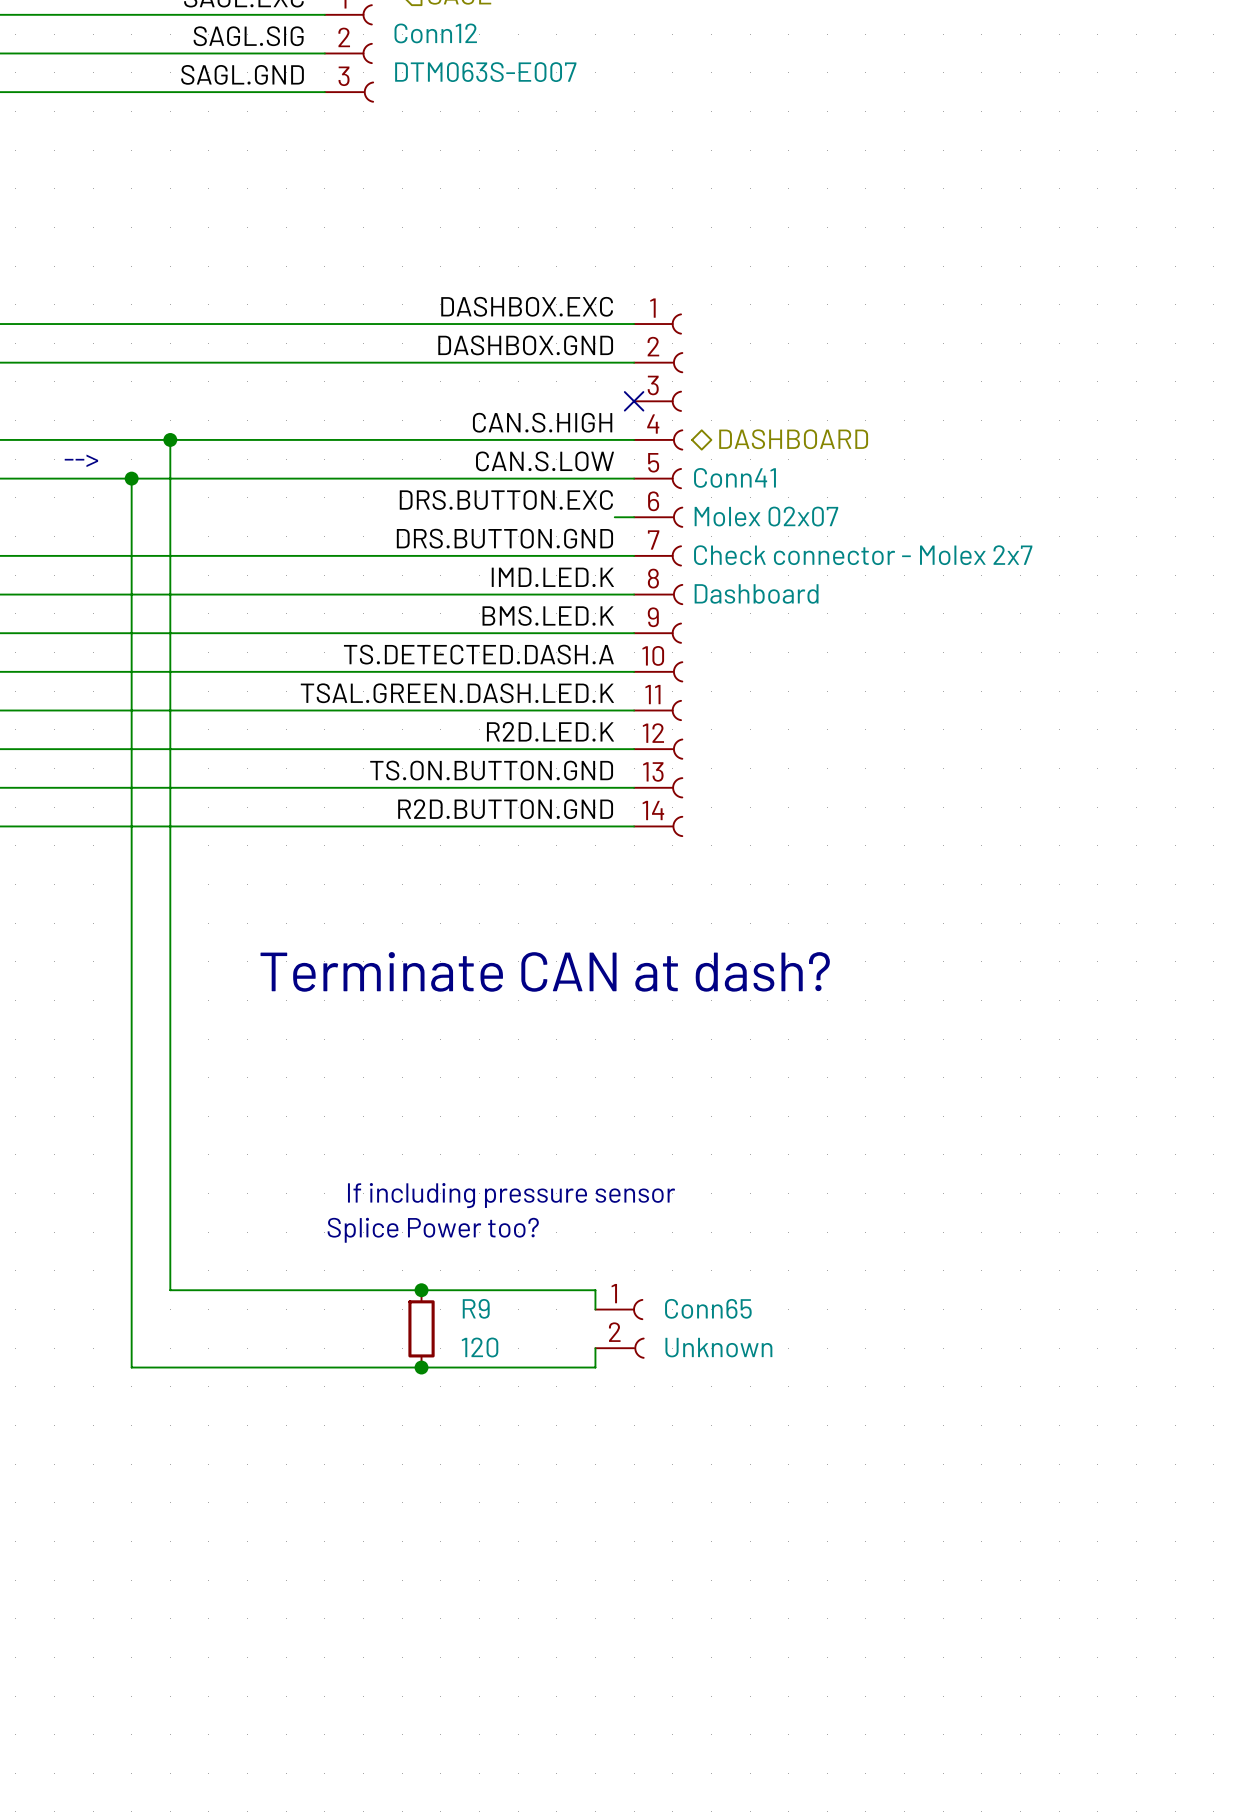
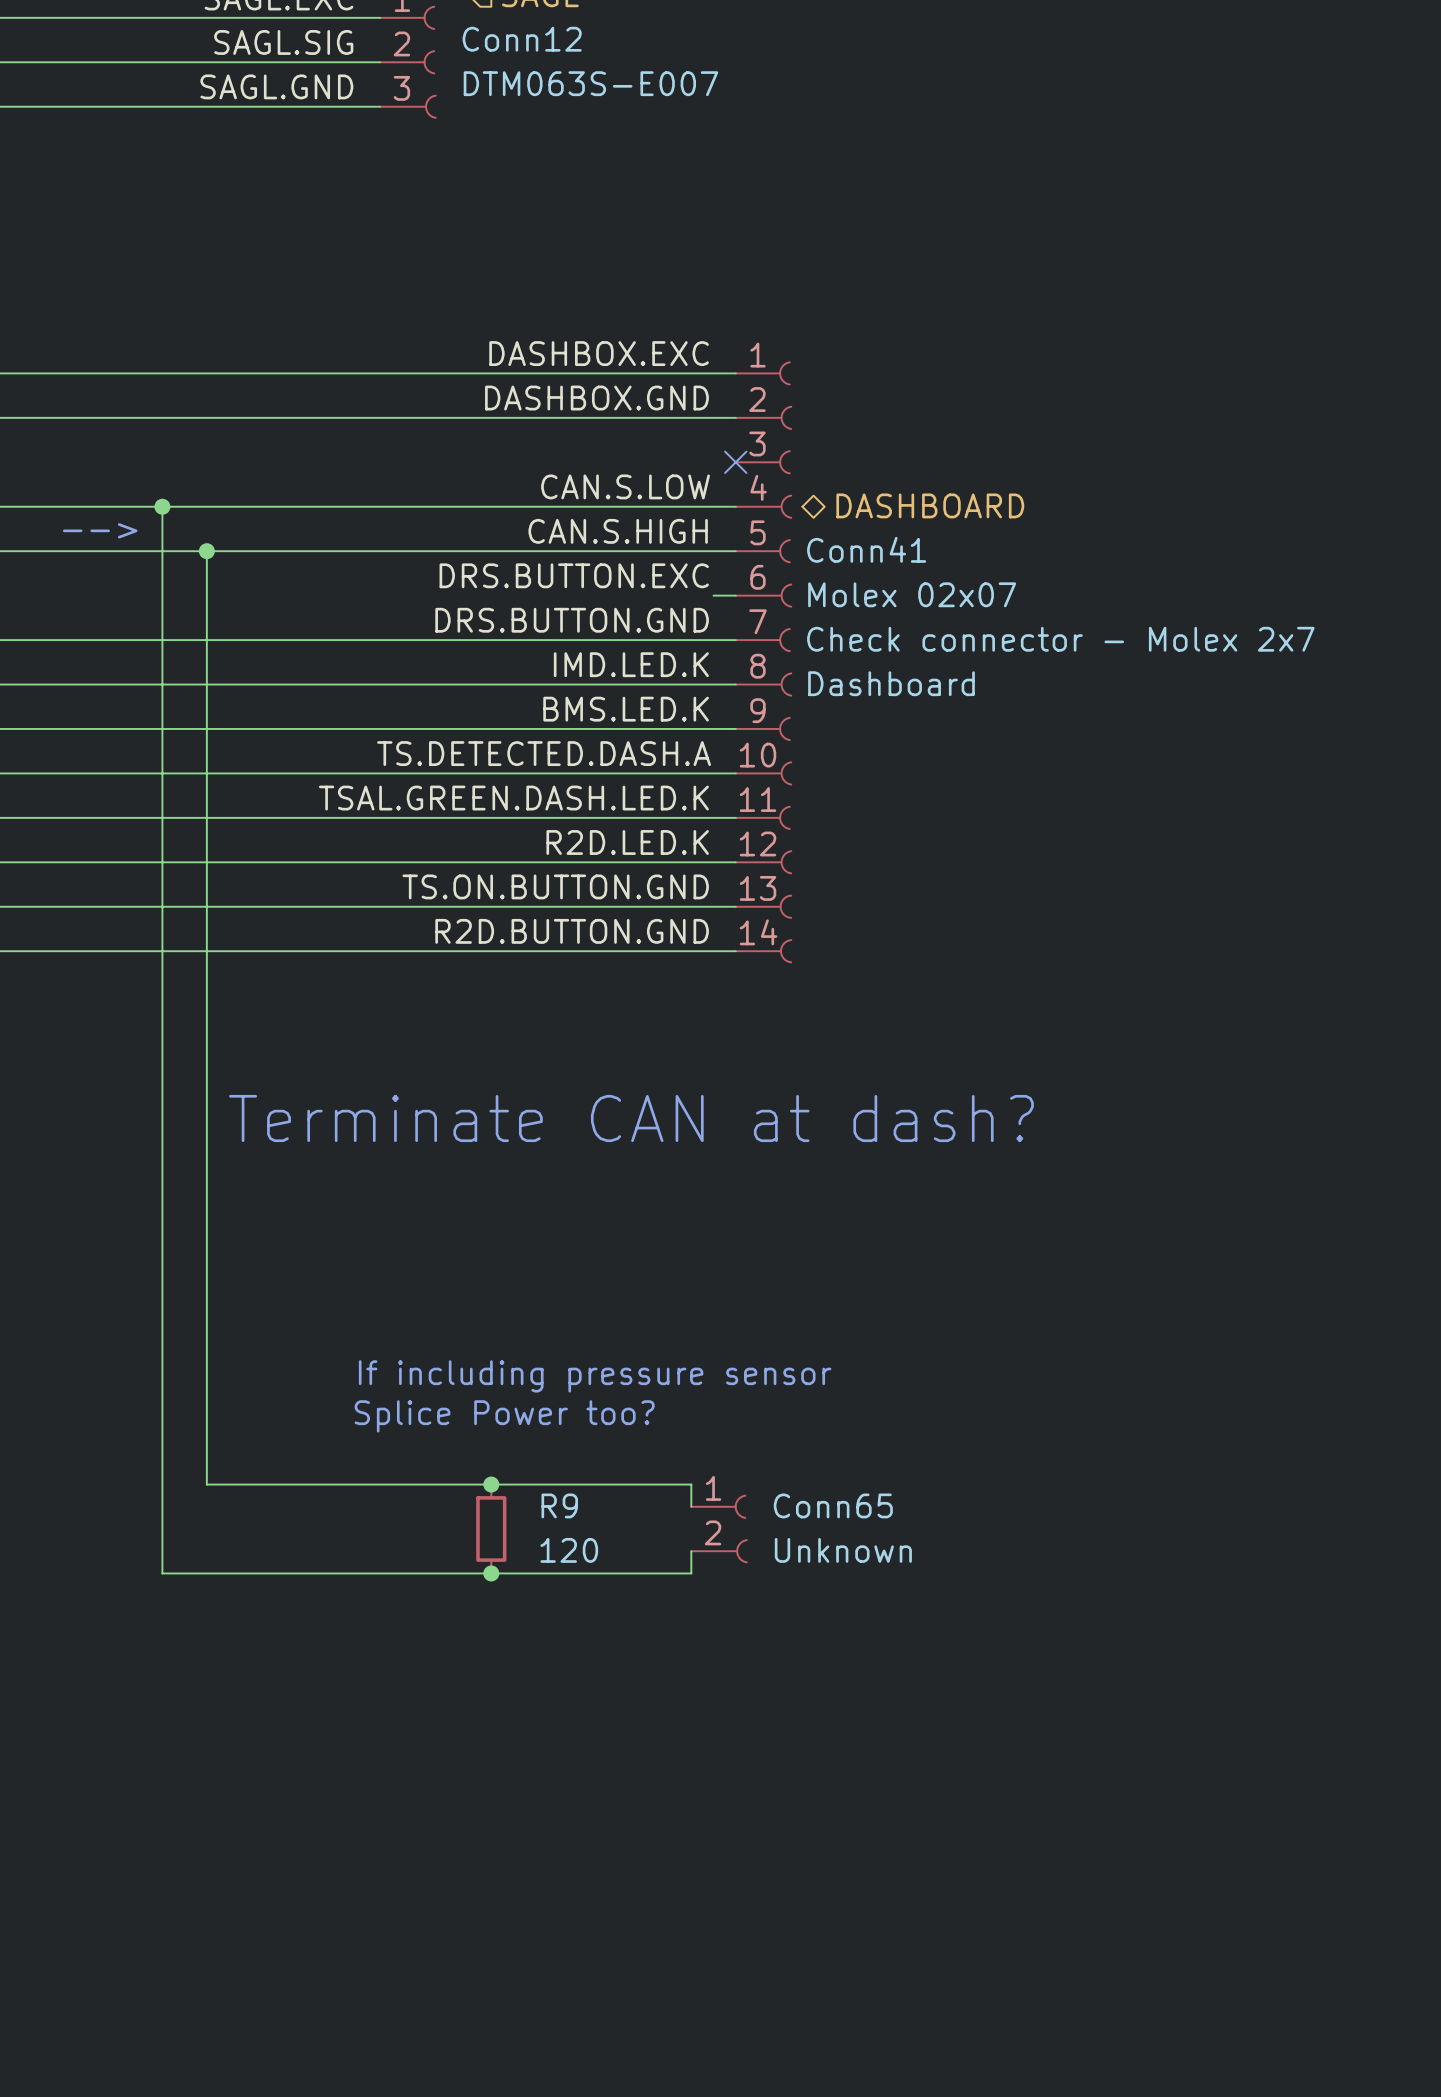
label: CAN.S.HIGH (542, 422) -> CAN.S.LOW (625, 486)
junction: none -> (162, 506)
wire: (170, 439) (170, 1290) (174, 1290) -> (206, 551) (206, 1484)
junction: (170, 439) -> none
label: CAN.S.LOW (545, 461) -> CAN.S.HIGH (618, 531)
wire: (131, 478) (131, 1367) (135, 1367) -> (162, 506) (162, 1573)
junction: (131, 478) -> none
junction: none -> (206, 551)

